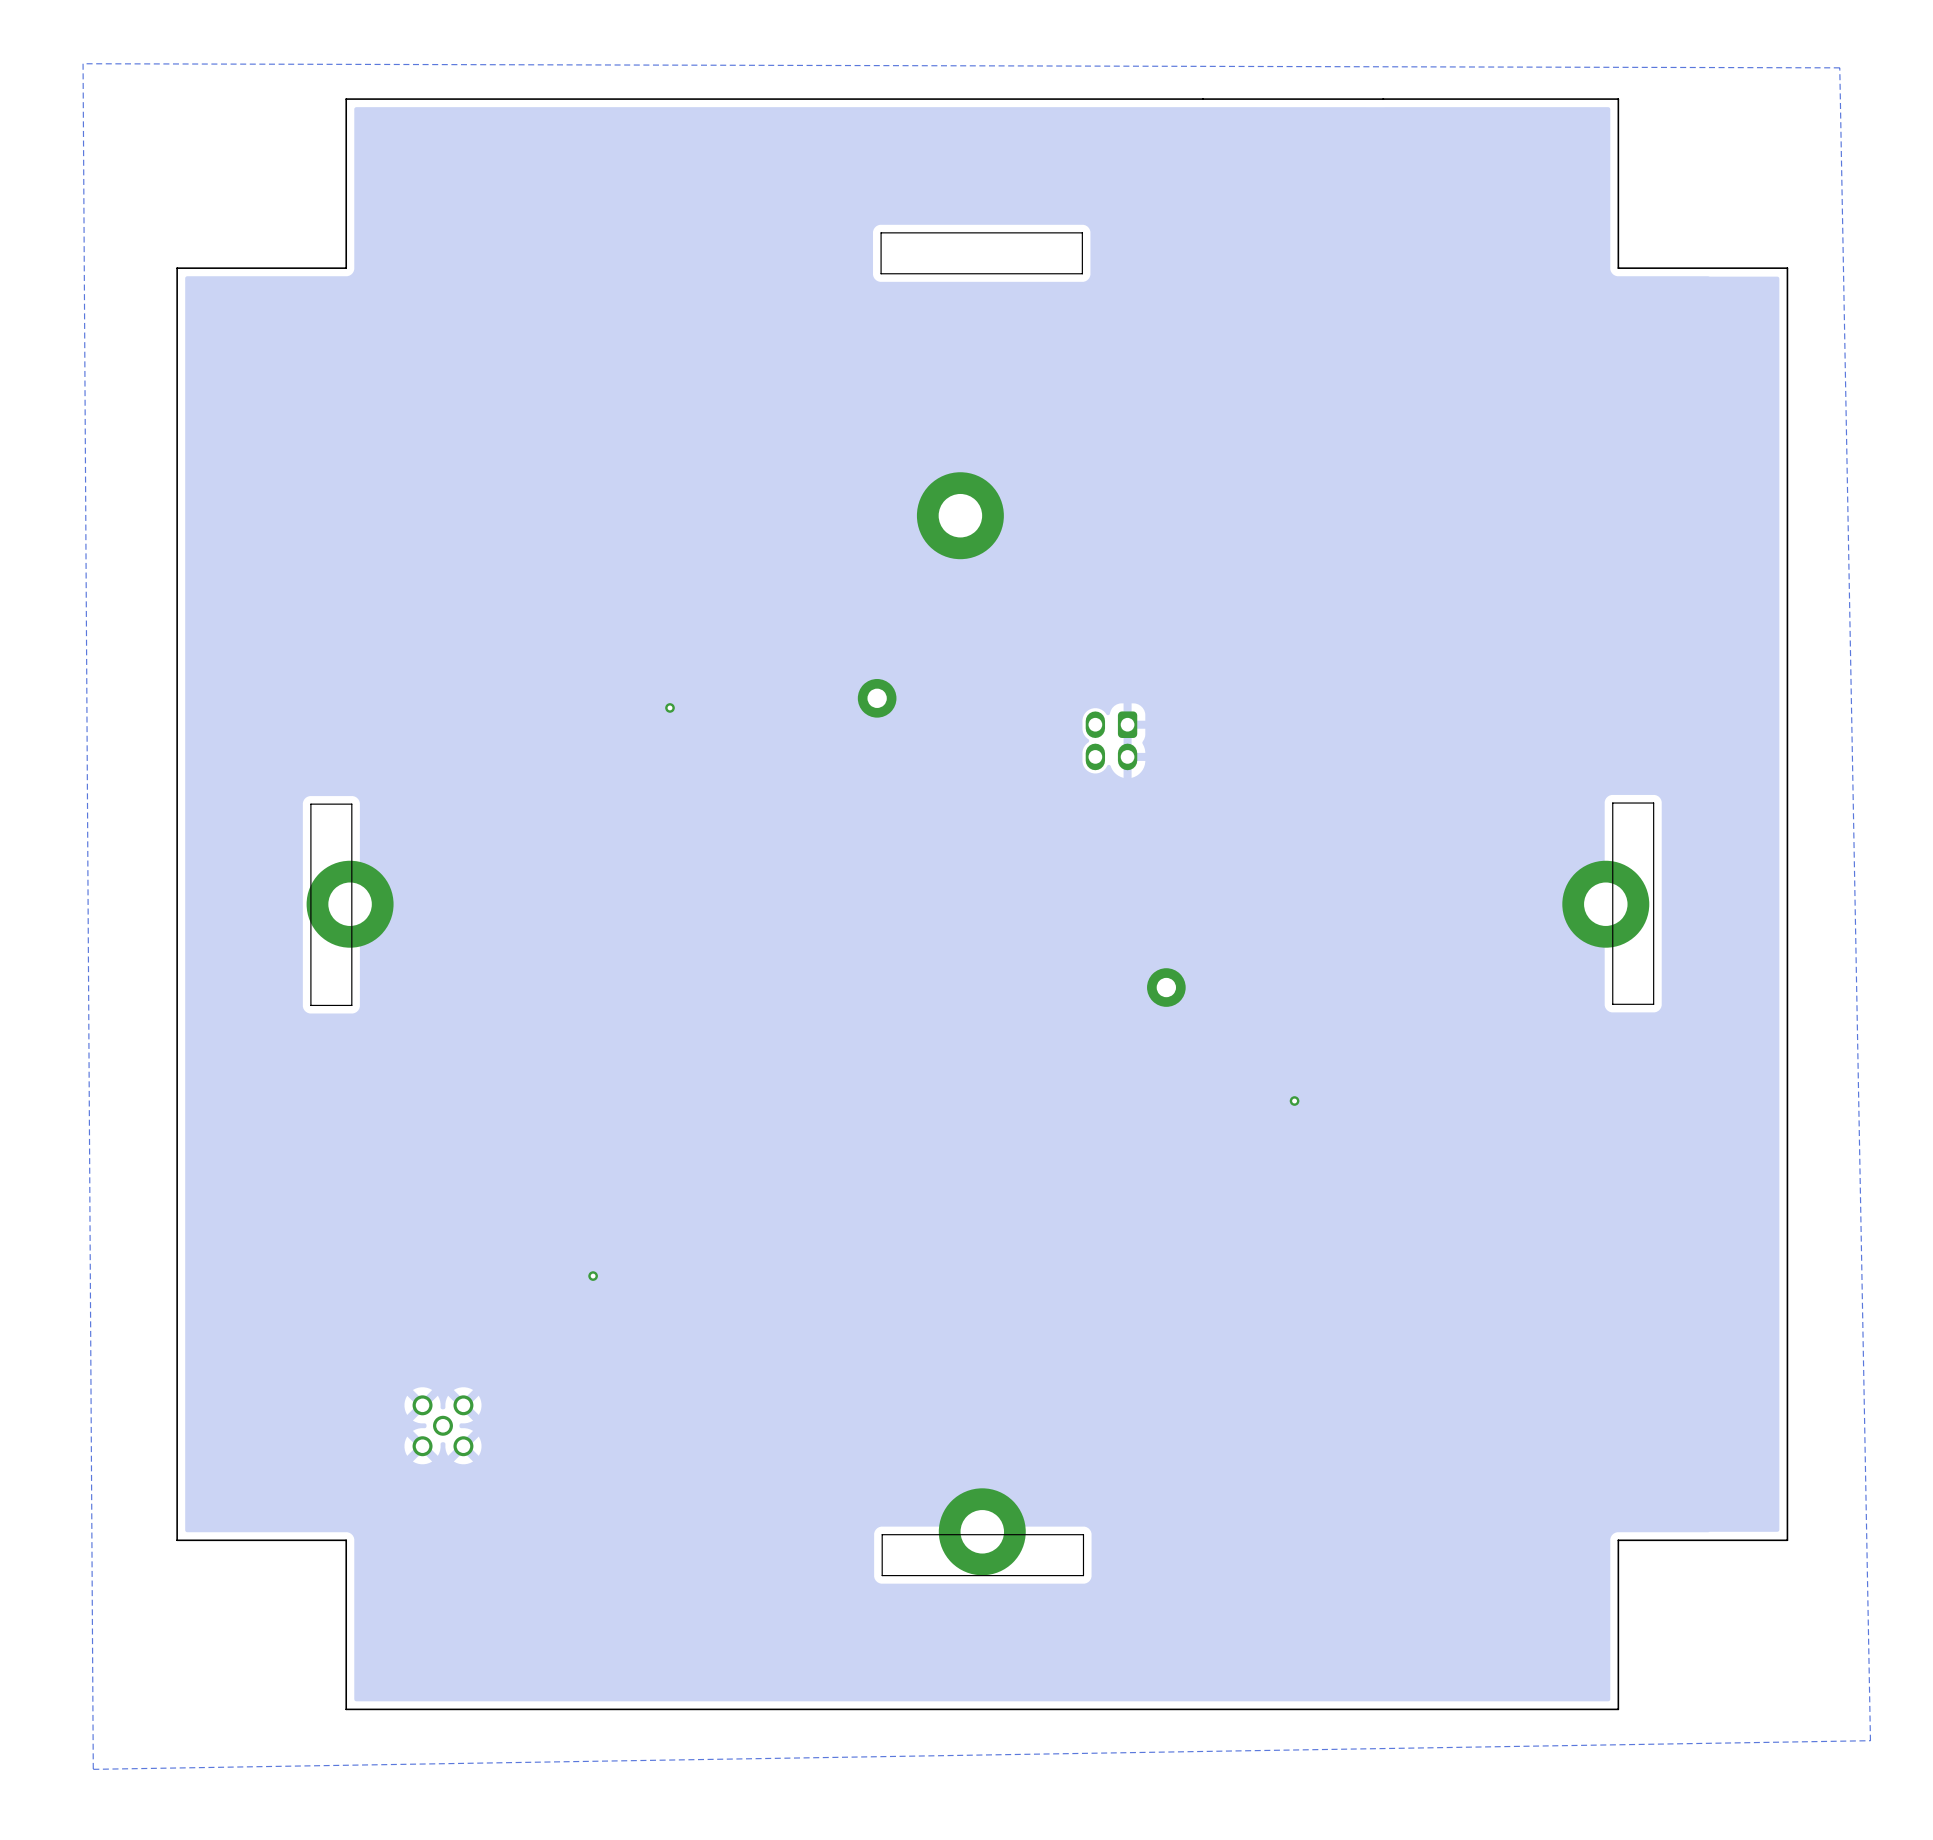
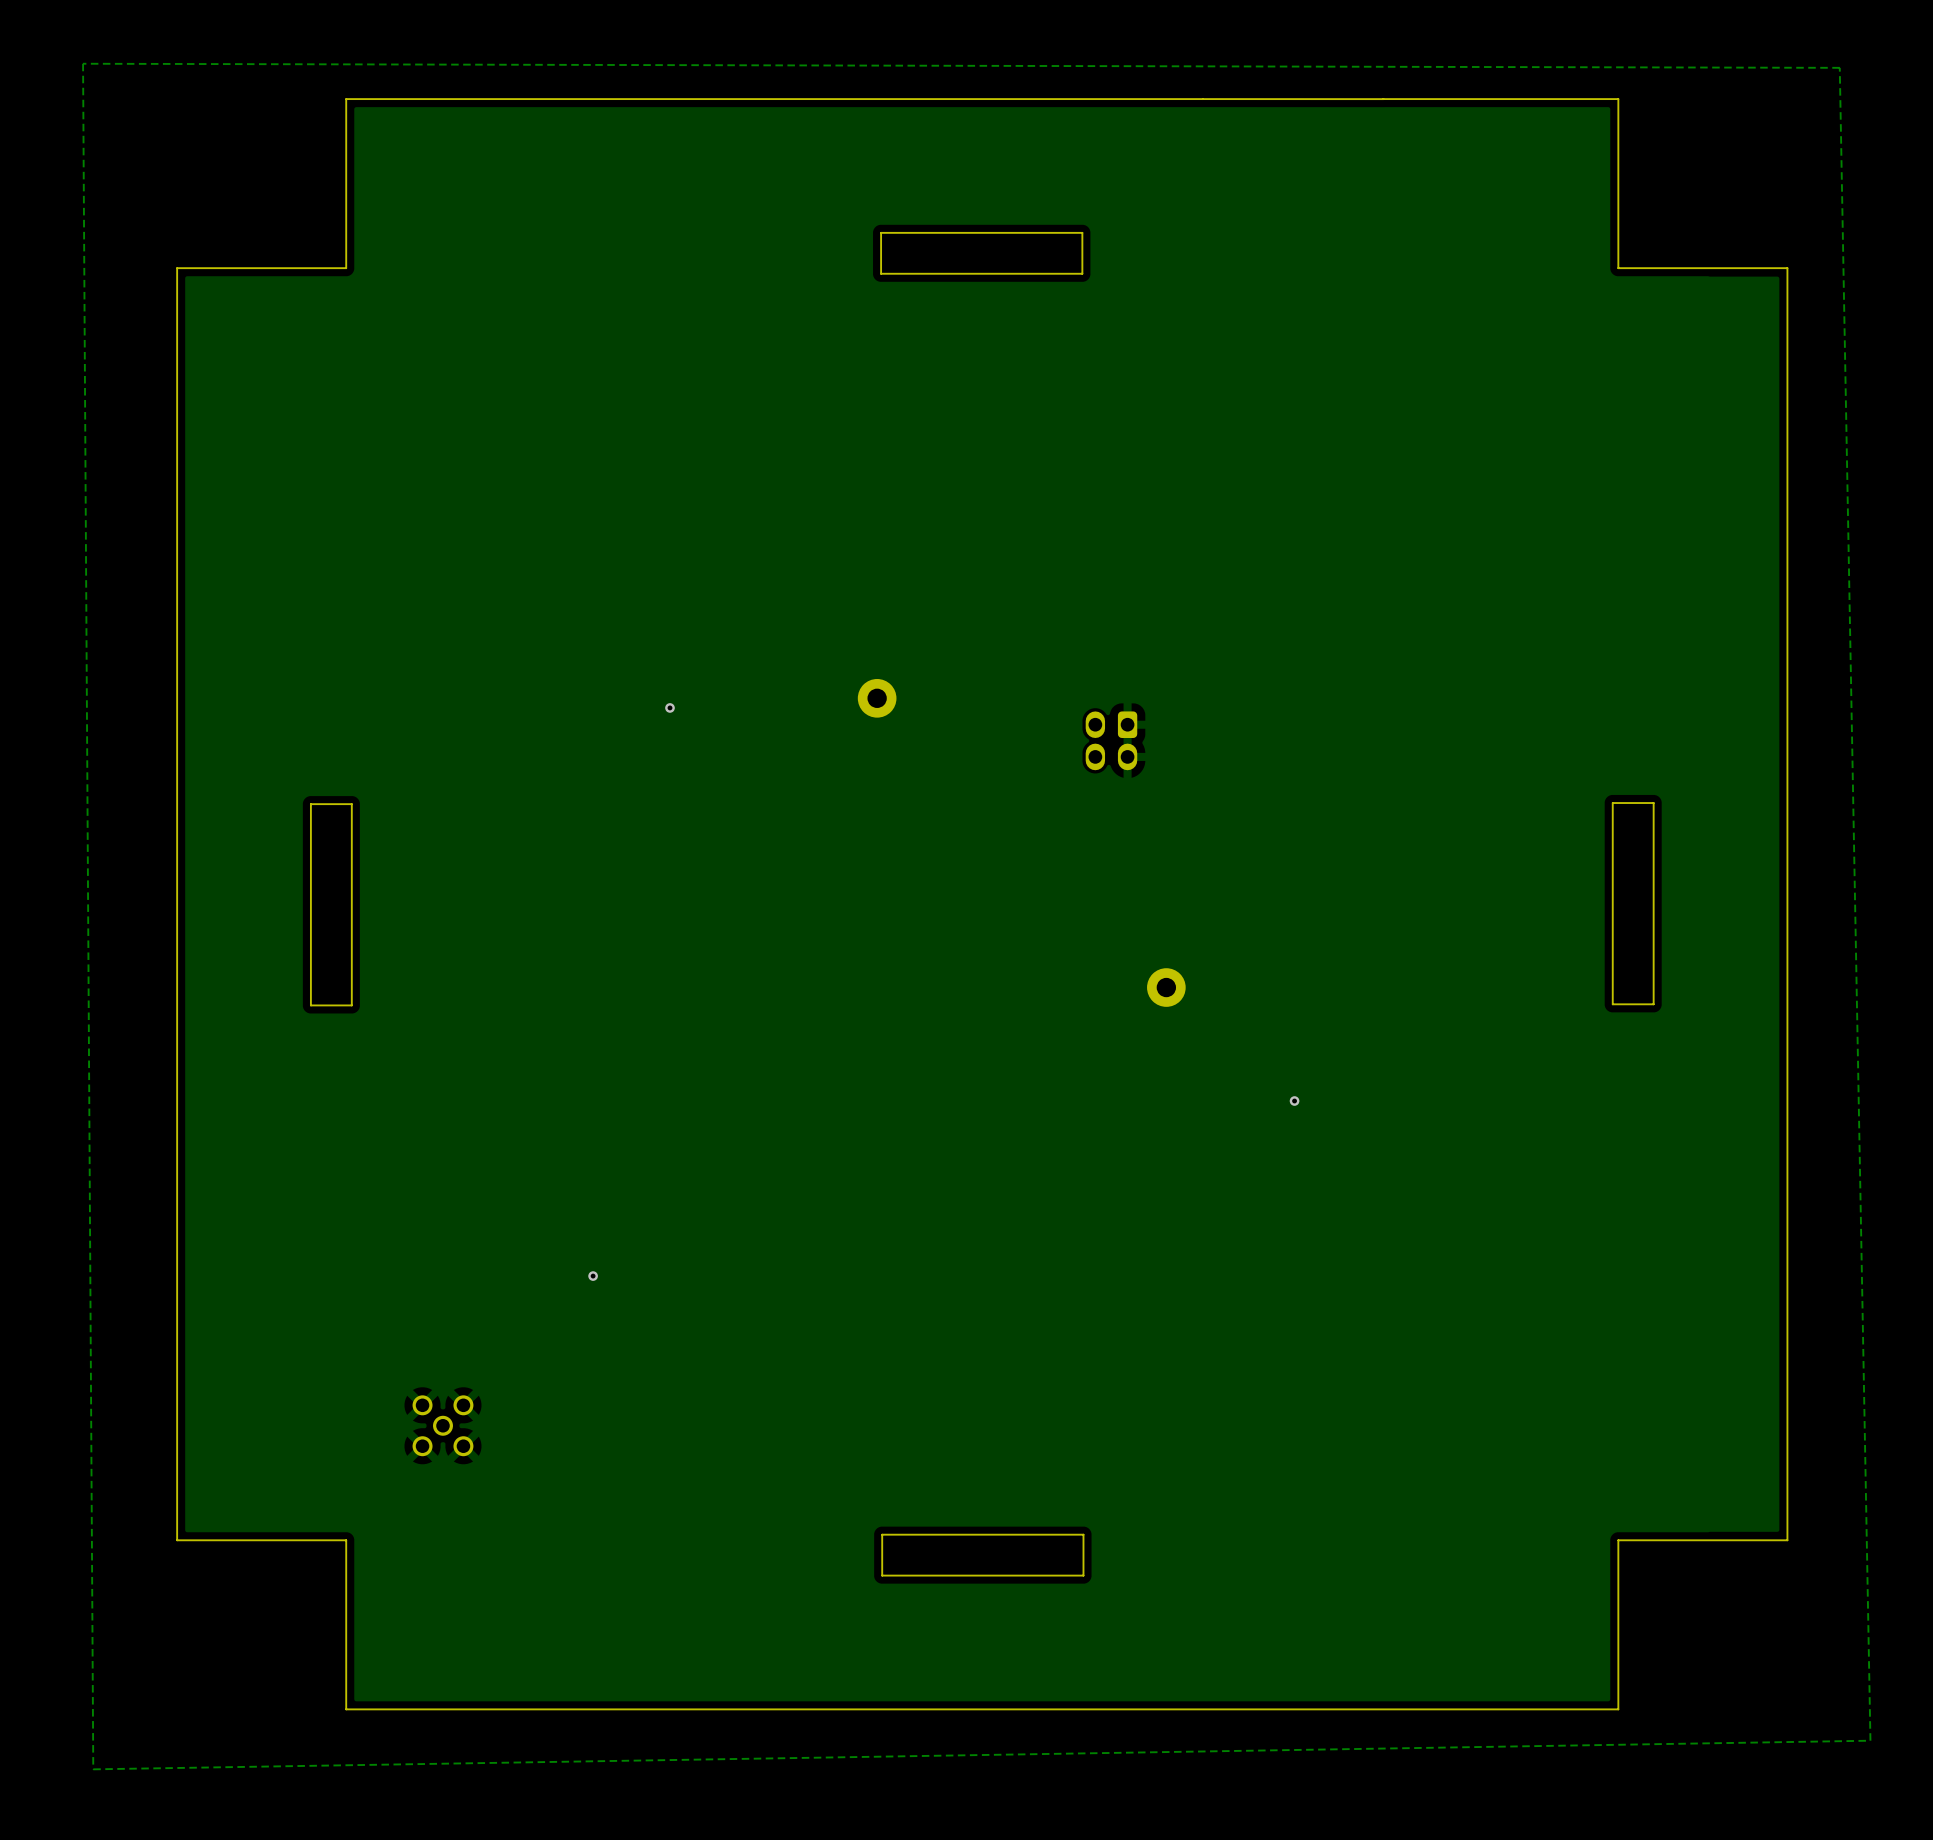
part: (960, 515) -> none
part: (350, 904) -> none
part: (1605, 904) -> none
part: (982, 1531) -> none

